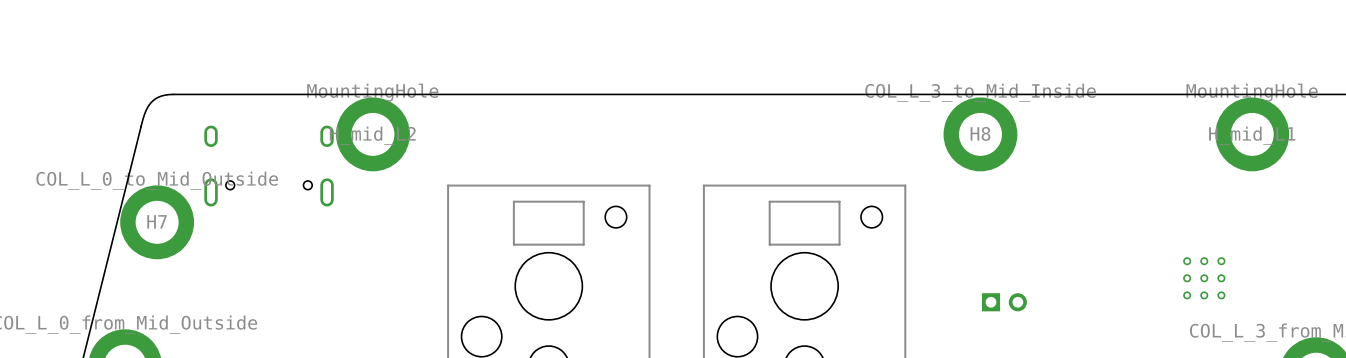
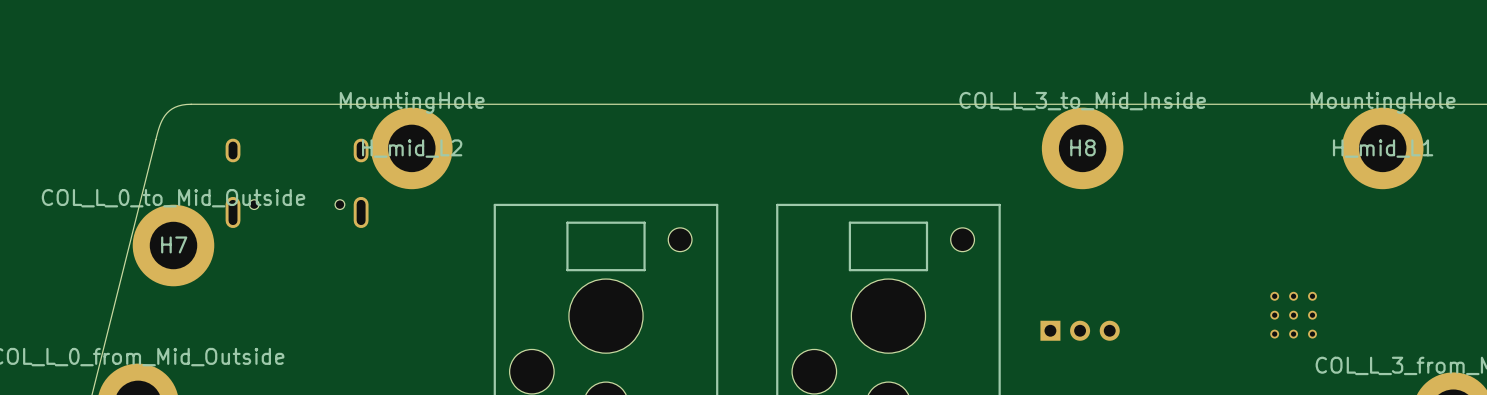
part position: (1204, 278) -> (1293, 315)
part: none -> (1080, 330)
part: (1004, 302) -> none

